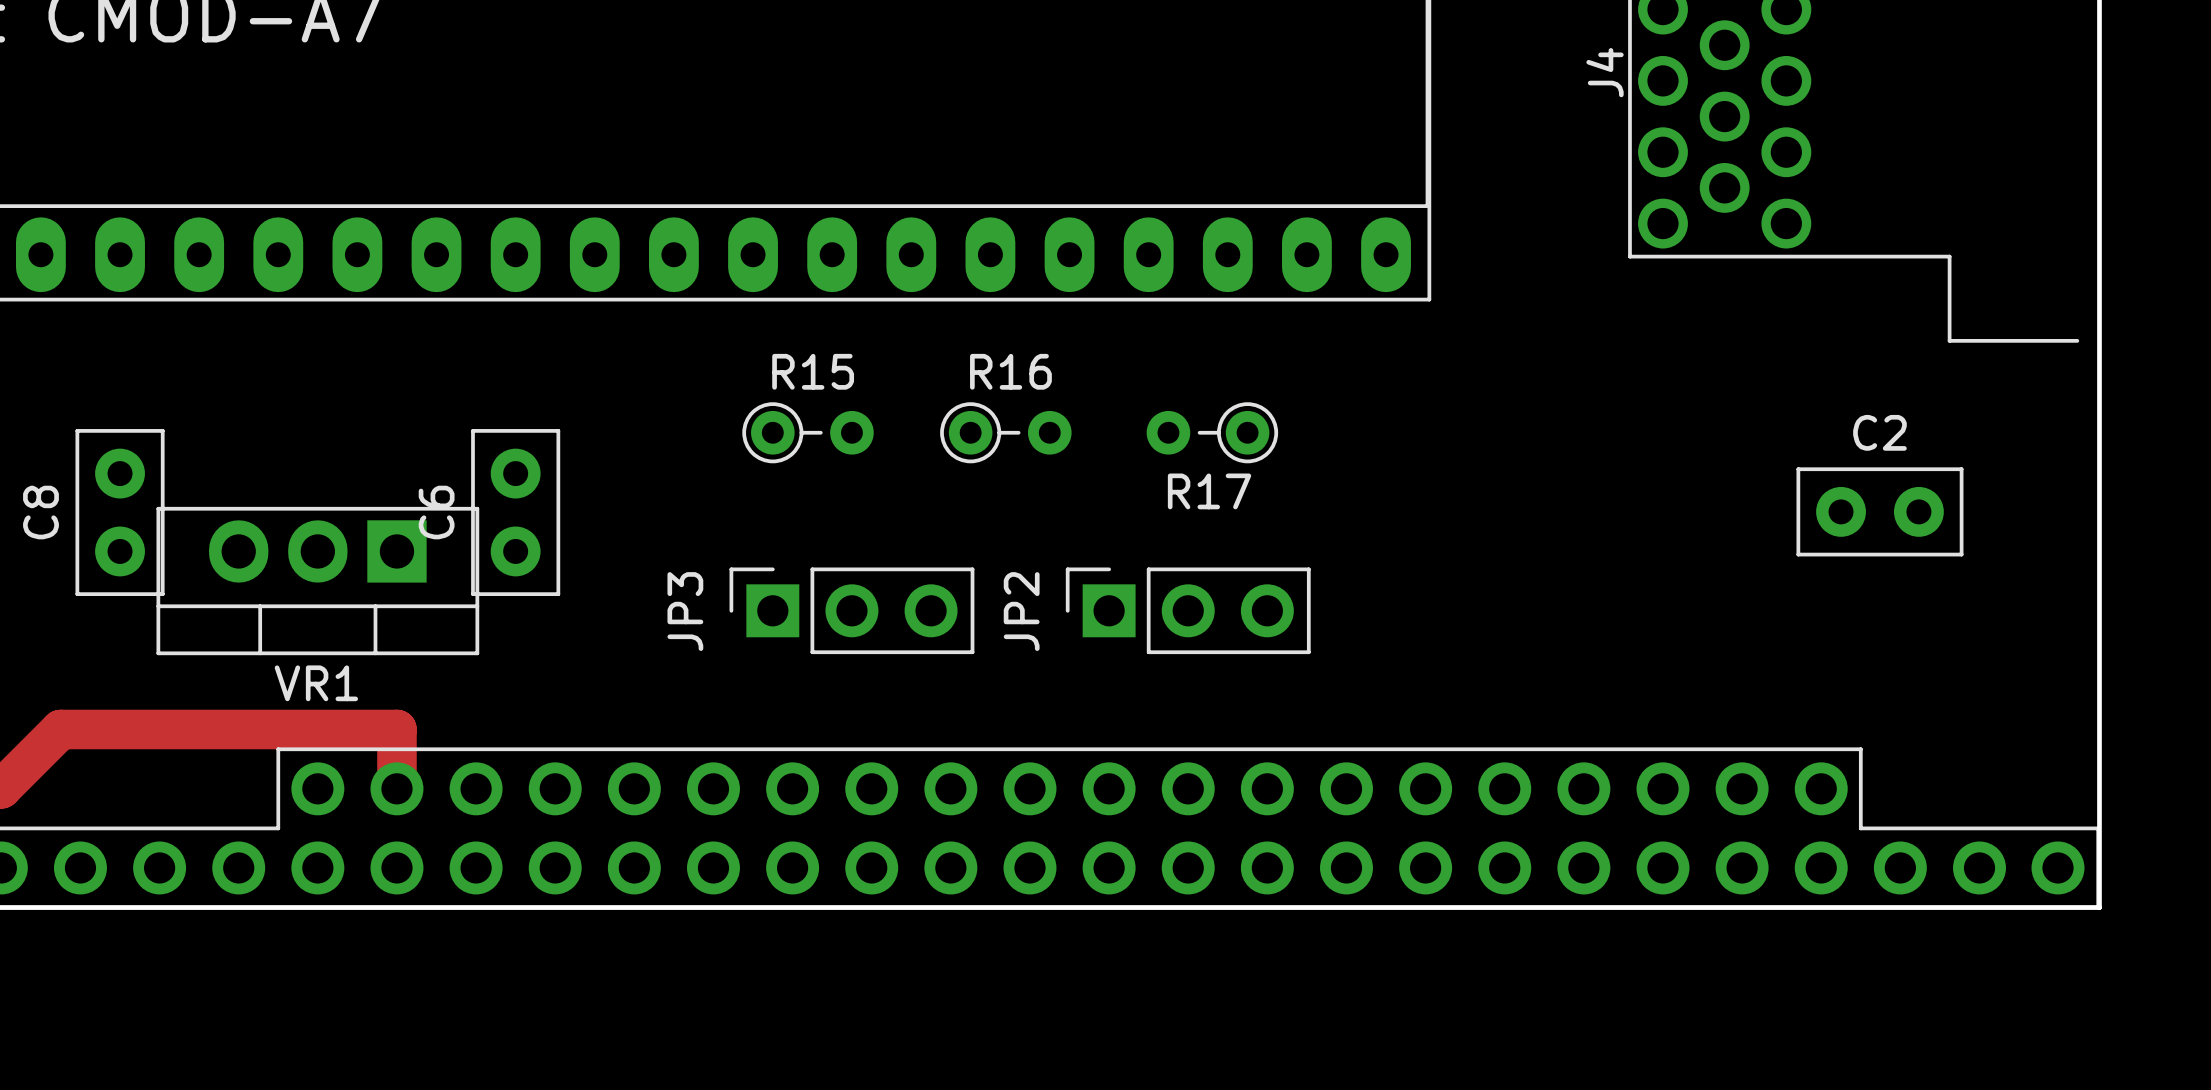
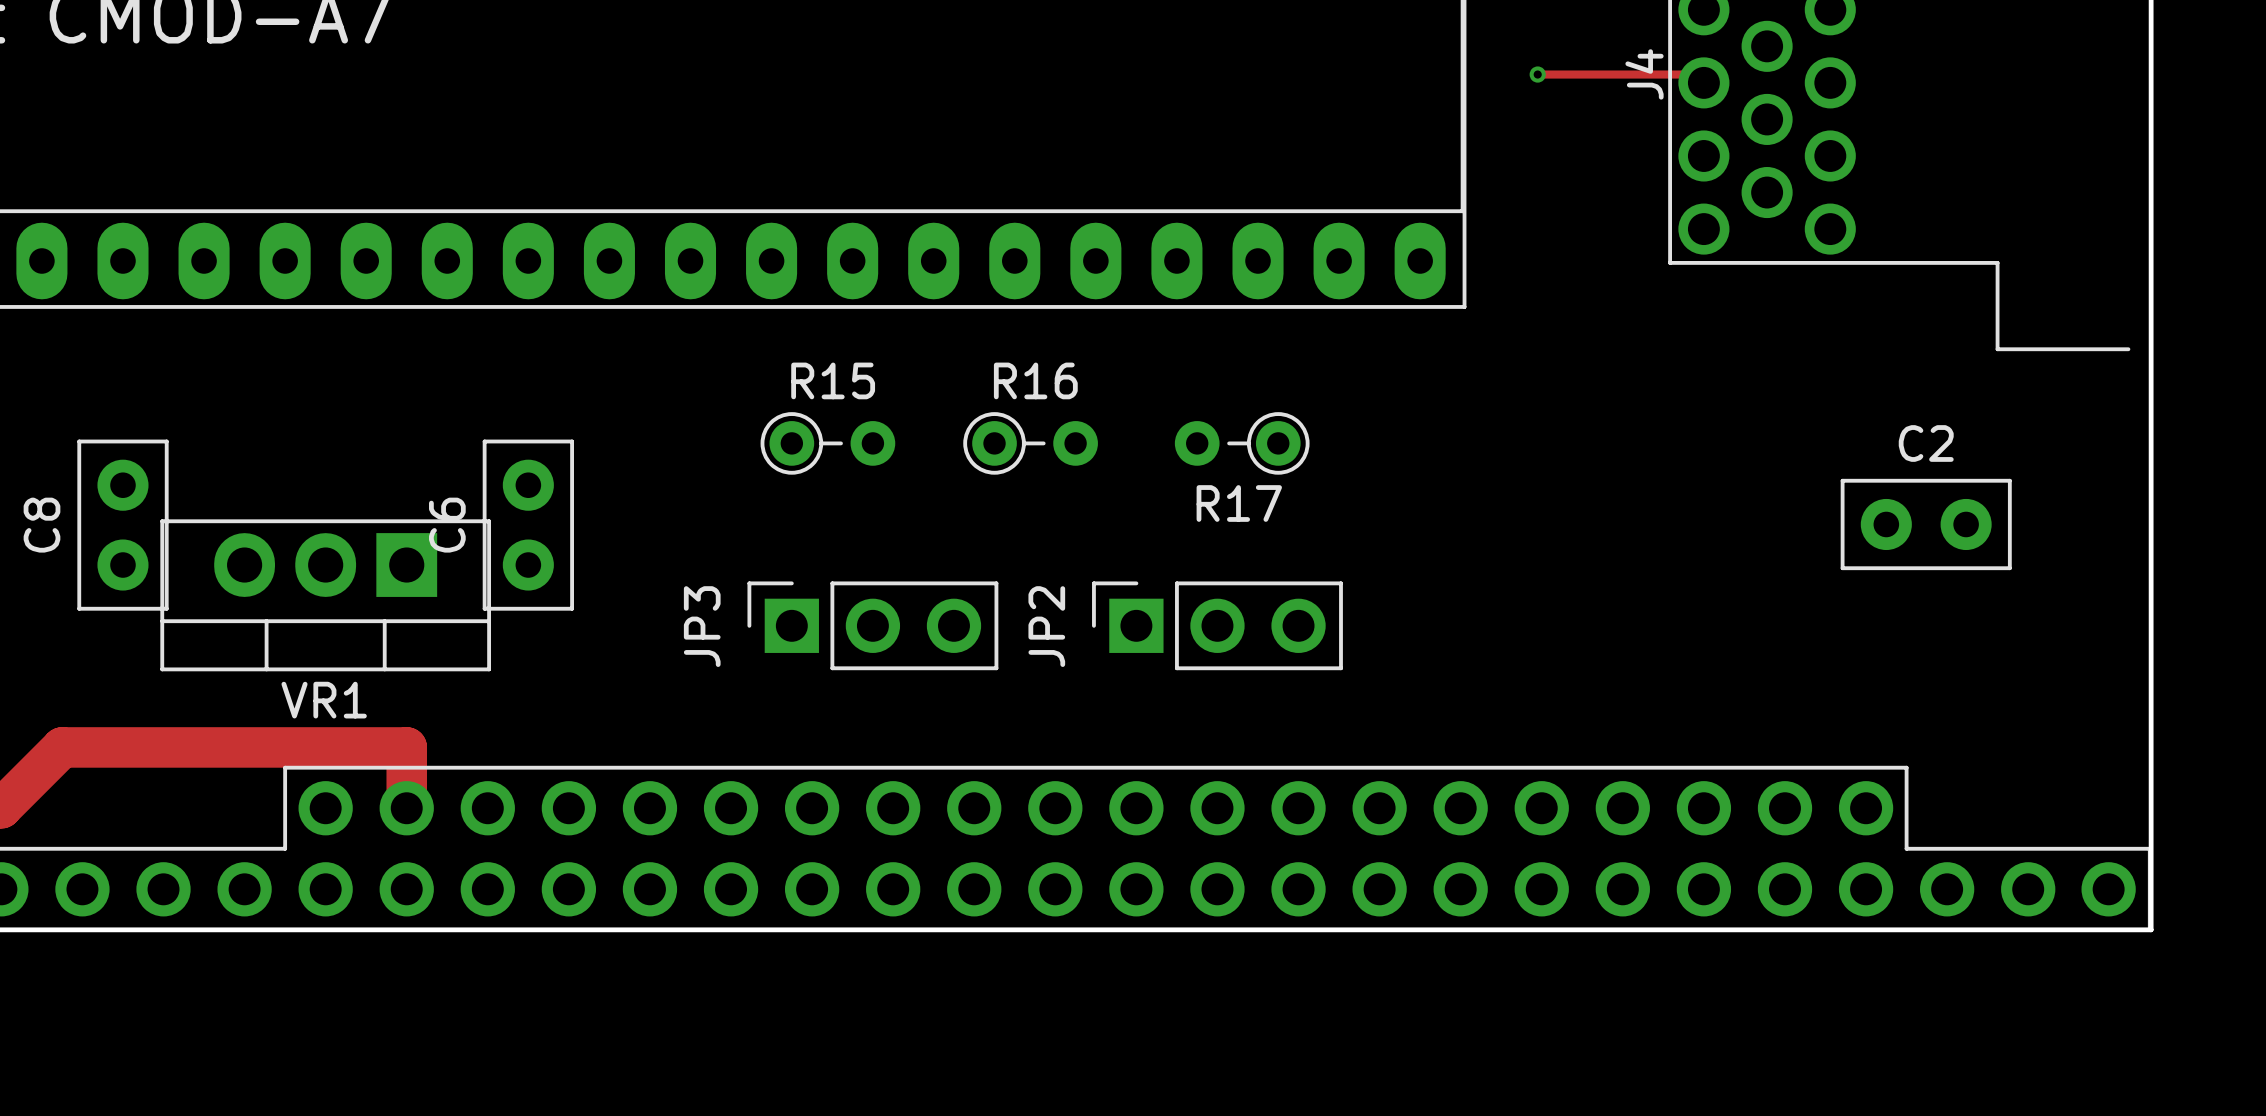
track: none -> (1537, 74) (1695, 74) (1703, 82)
via: none -> (1537, 74)

